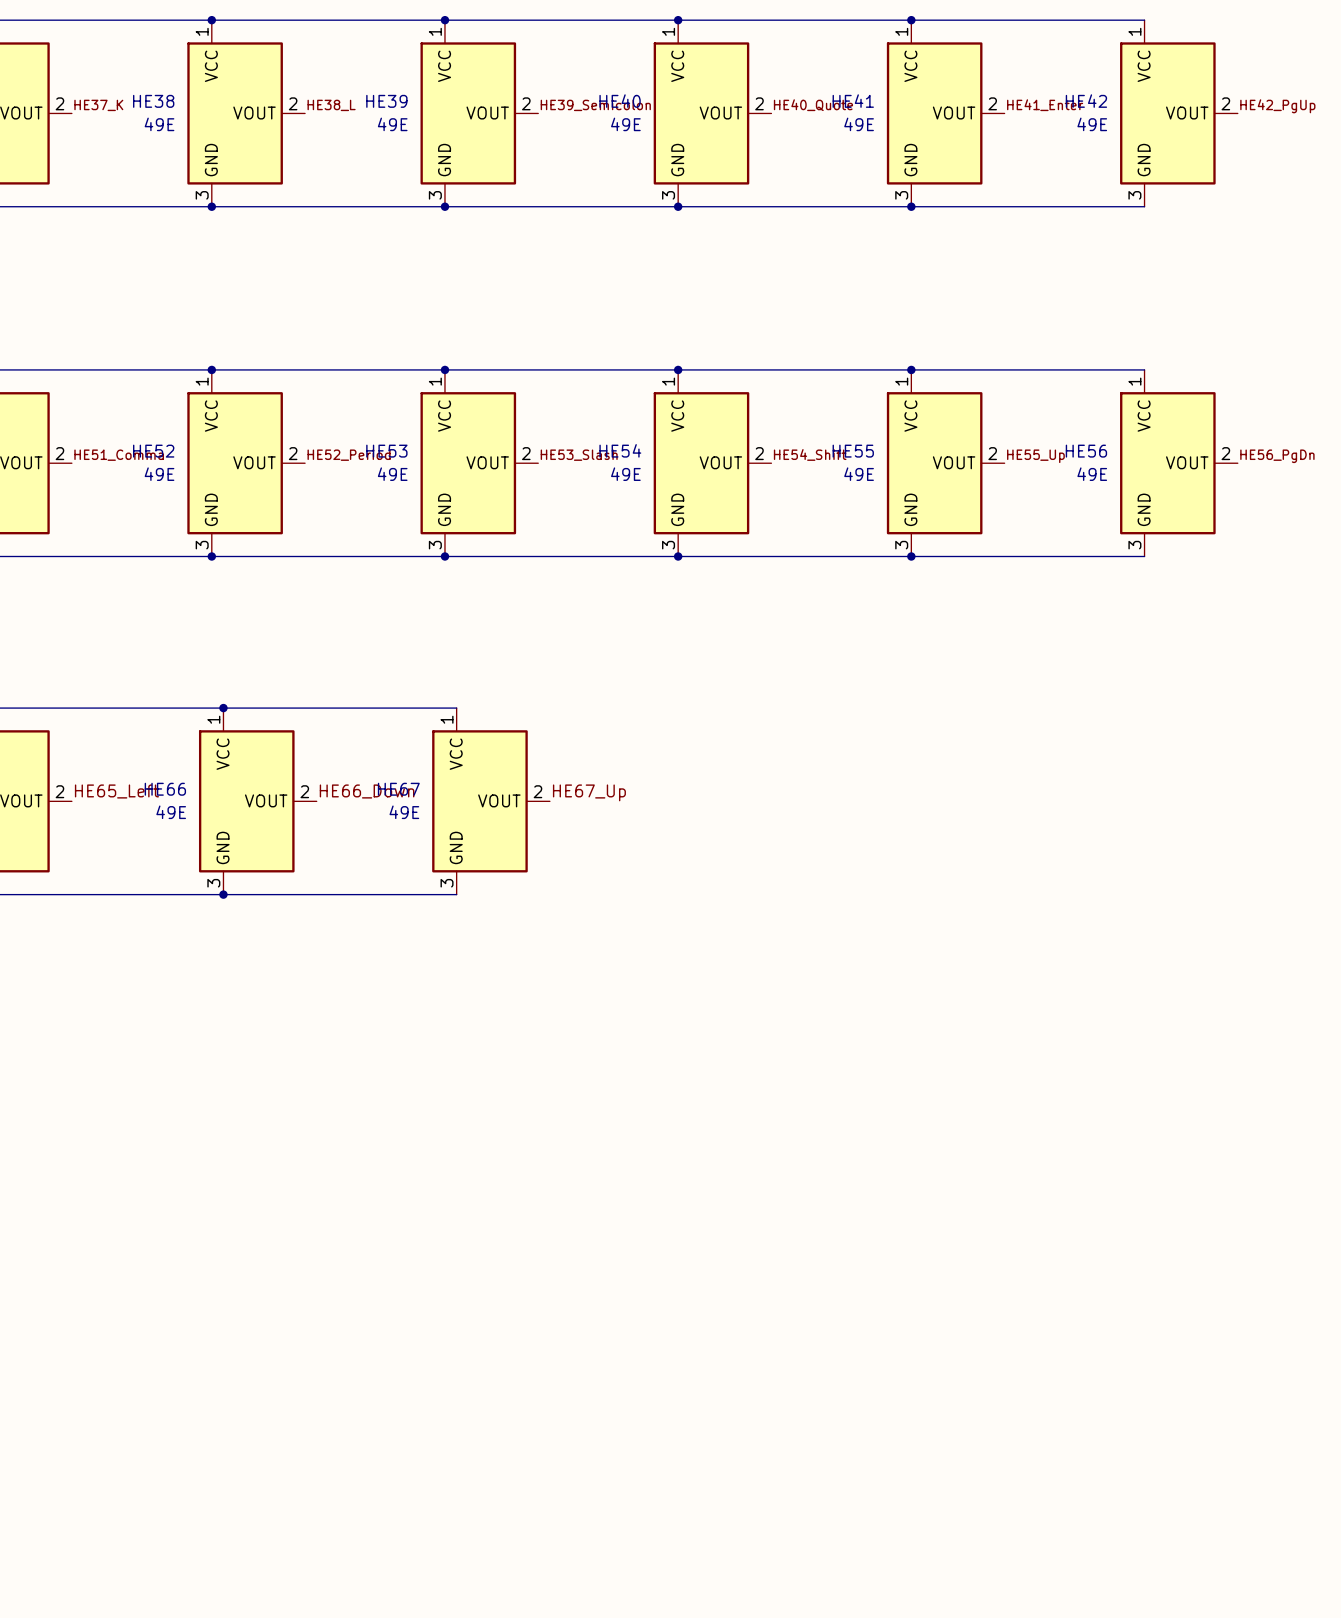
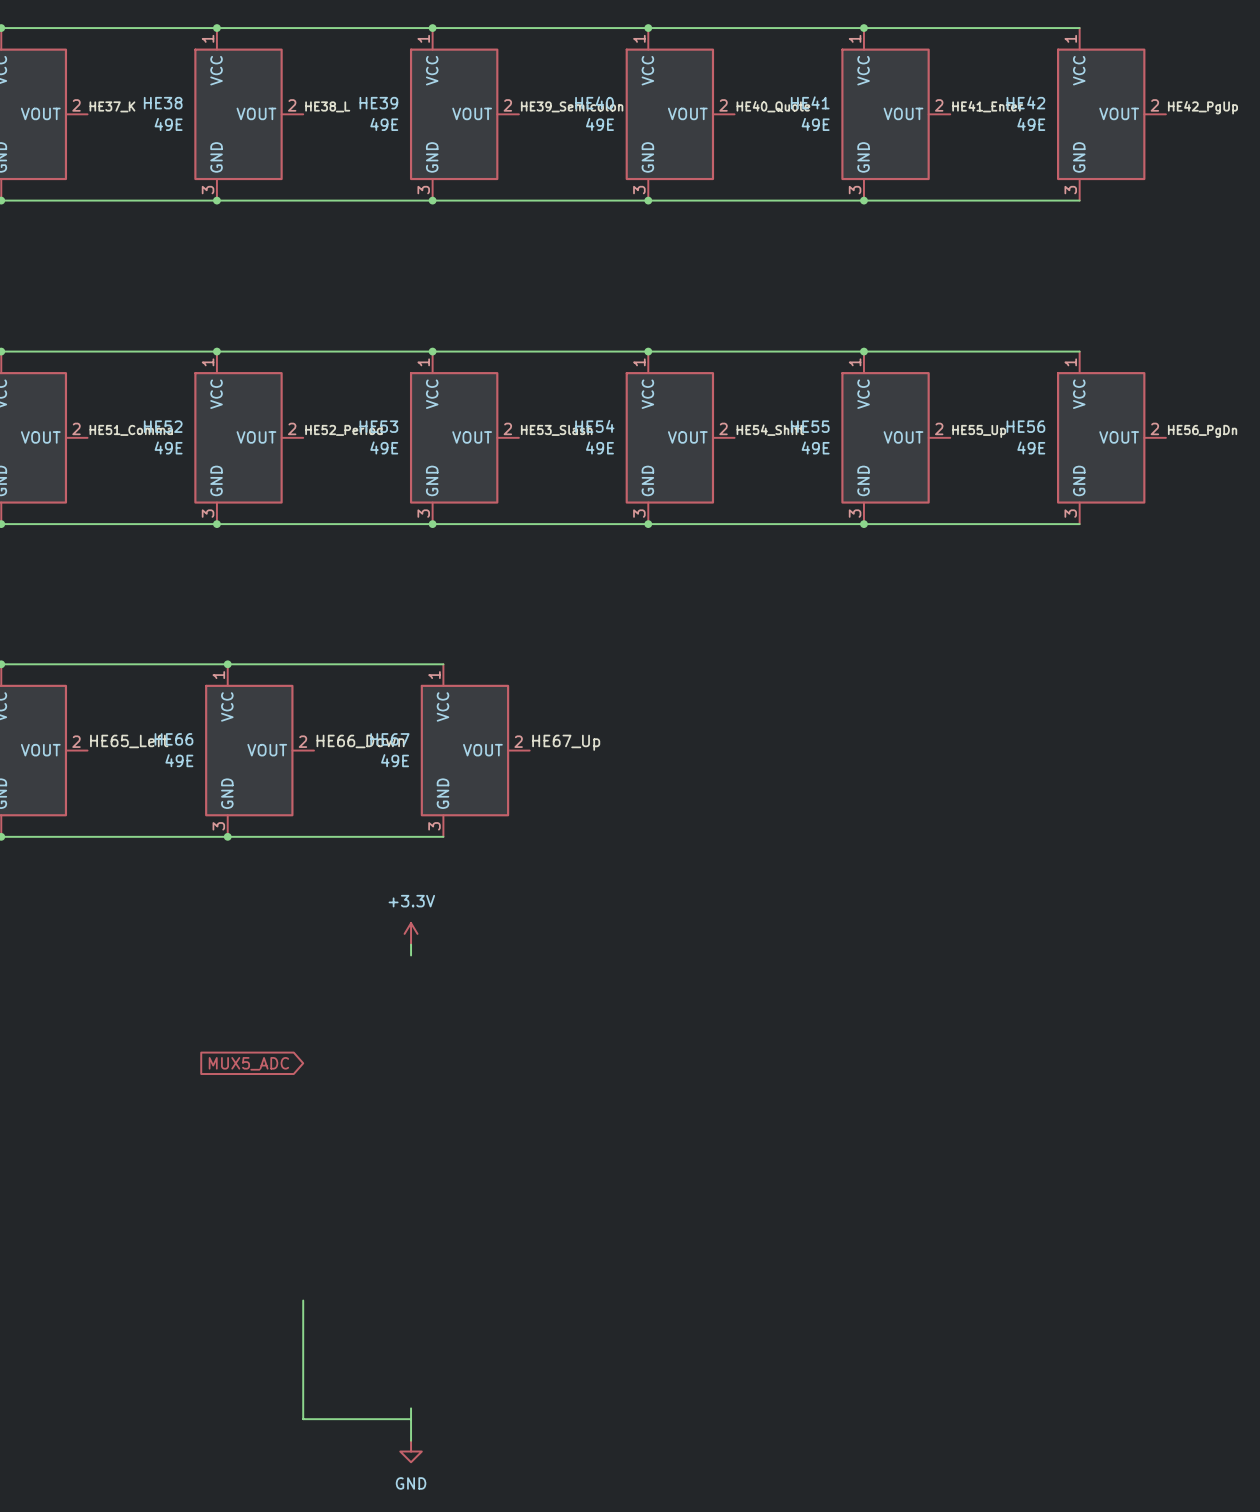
power symbol: none -> +3.3V (411, 933)
wire: none -> (411, 944) (411, 955)
global label: none -> MUX5_ADC (248, 1063)
wire: none -> (303, 1300) (303, 1419) (411, 1419)
wire: none -> (411, 1408) (411, 1440)
power symbol: none -> GND (411, 1451)

